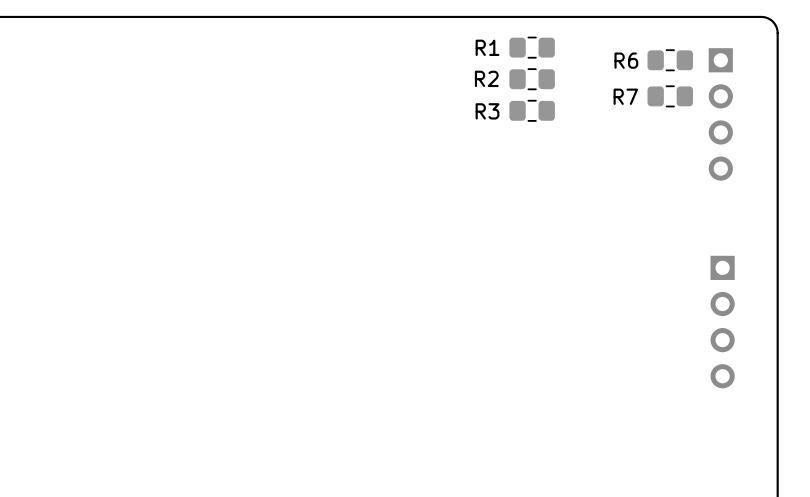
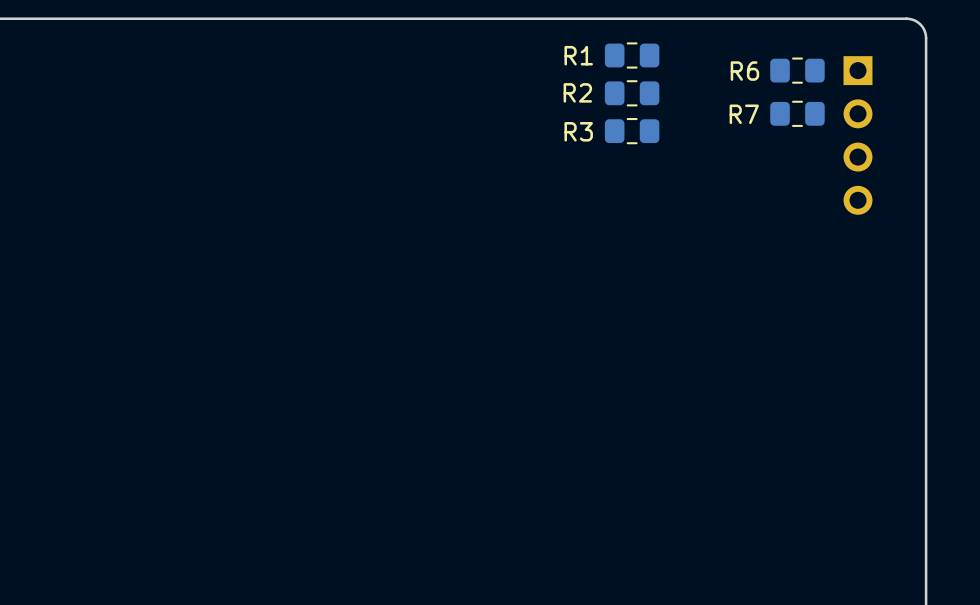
part: (722, 322) -> none

